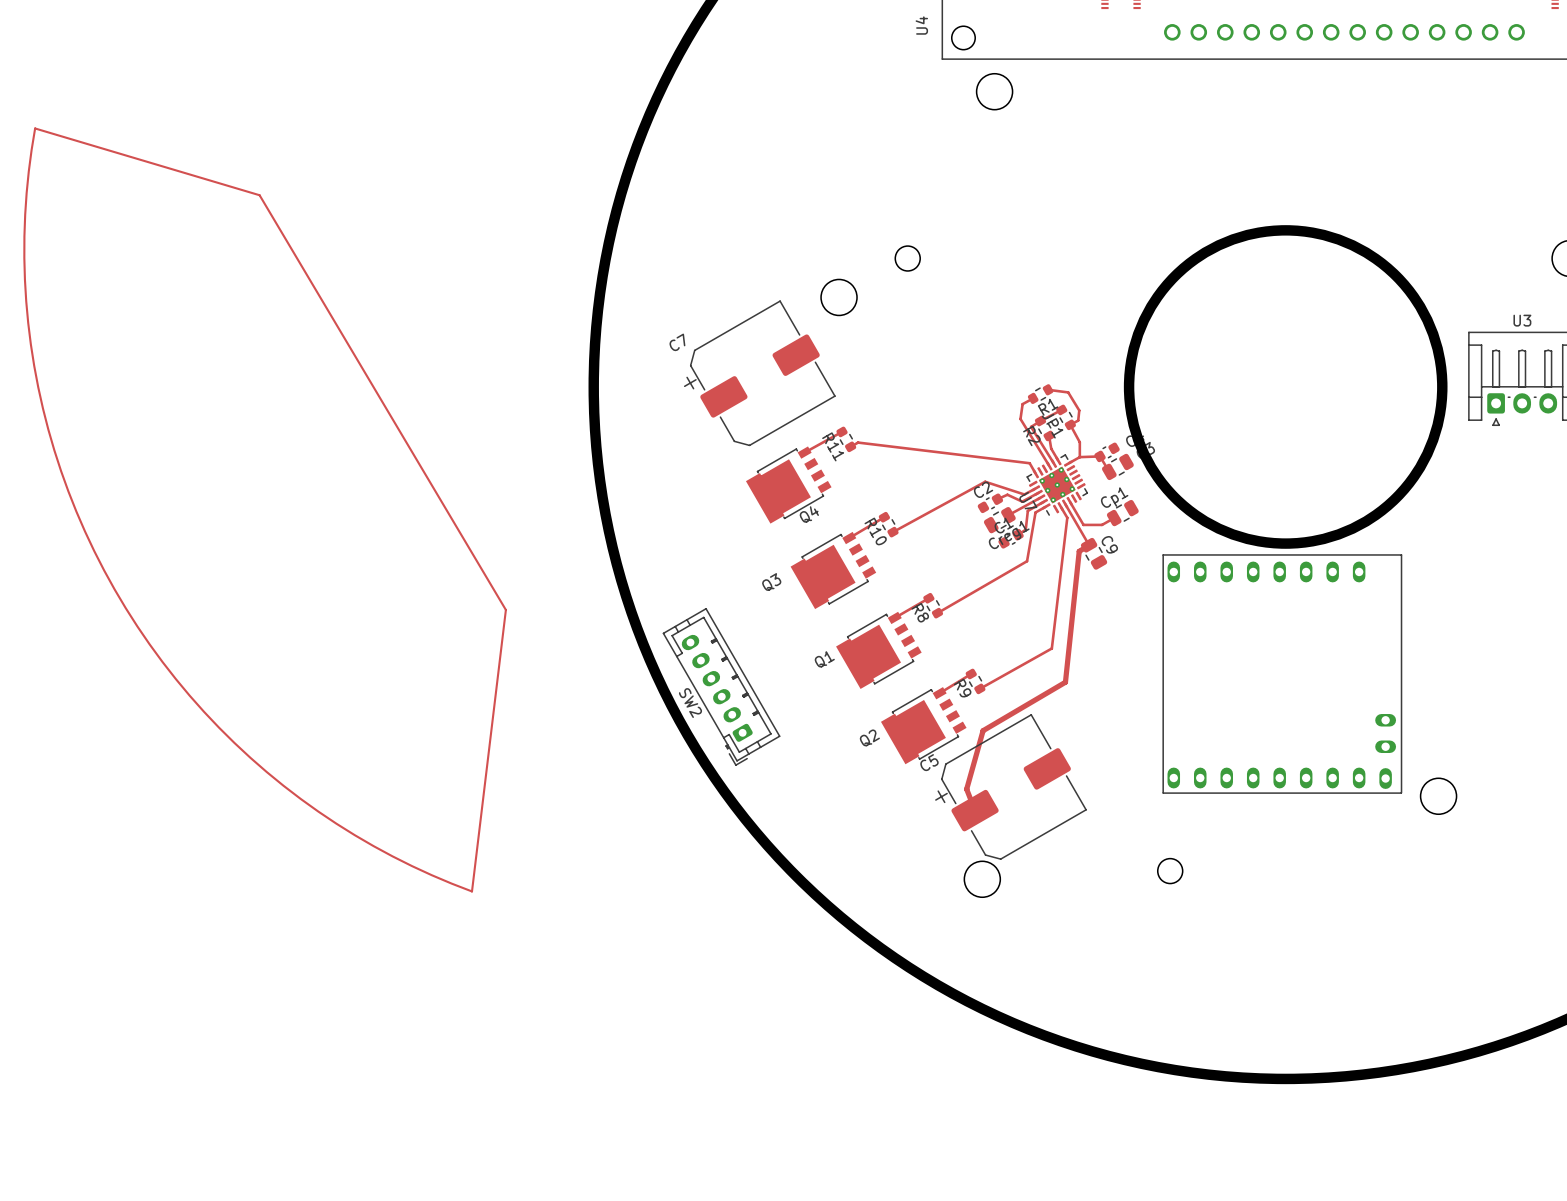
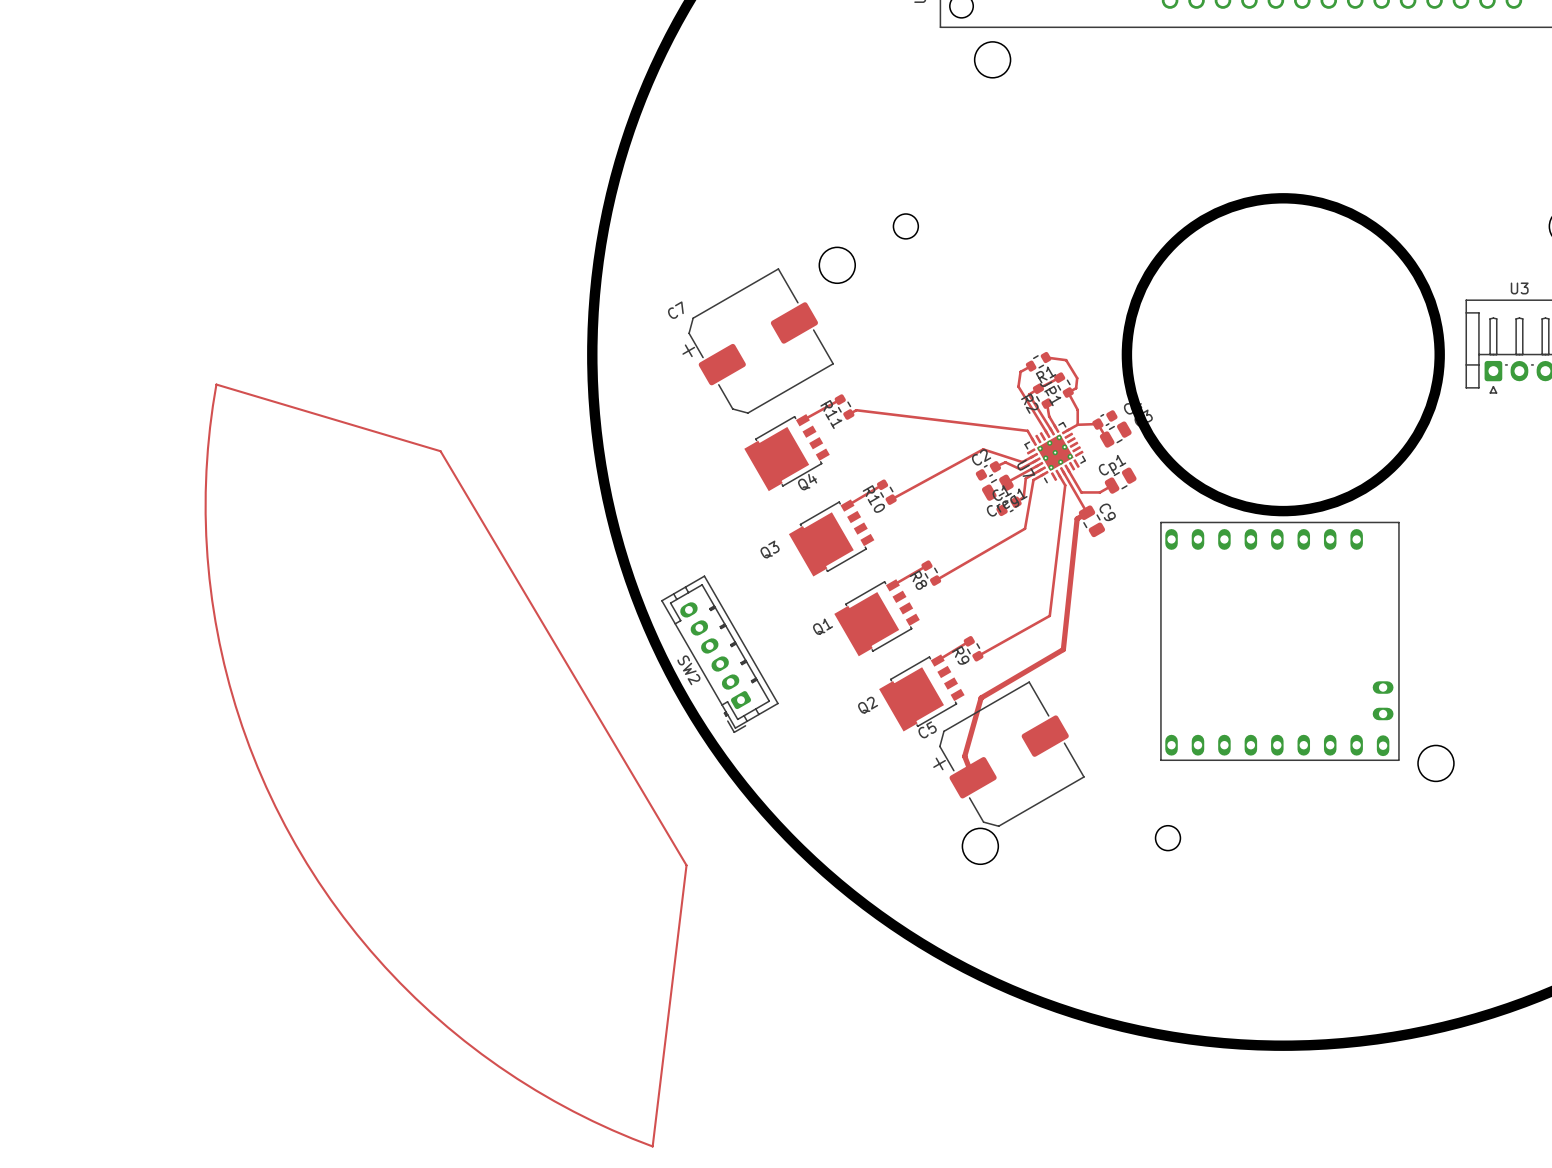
track: (35, 128) (259, 195) (505, 609) (472, 891) (412, 866) (354, 835) (318, 811) (266, 771) (234, 742) (189, 695) (149, 644) (114, 589) (94, 551) (68, 491) (48, 429) (34, 366) (28, 323) (24, 258) (26, 193) (35, 128) -> none
track: none -> (216, 384) (440, 451) (686, 865) (652, 1146) (592, 1121) (535, 1090) (481, 1054) (447, 1027) (400, 982) (356, 934) (330, 899) (295, 844) (266, 787) (242, 726) (229, 685) (215, 621) (209, 578) (205, 513) (207, 448) (216, 384)

